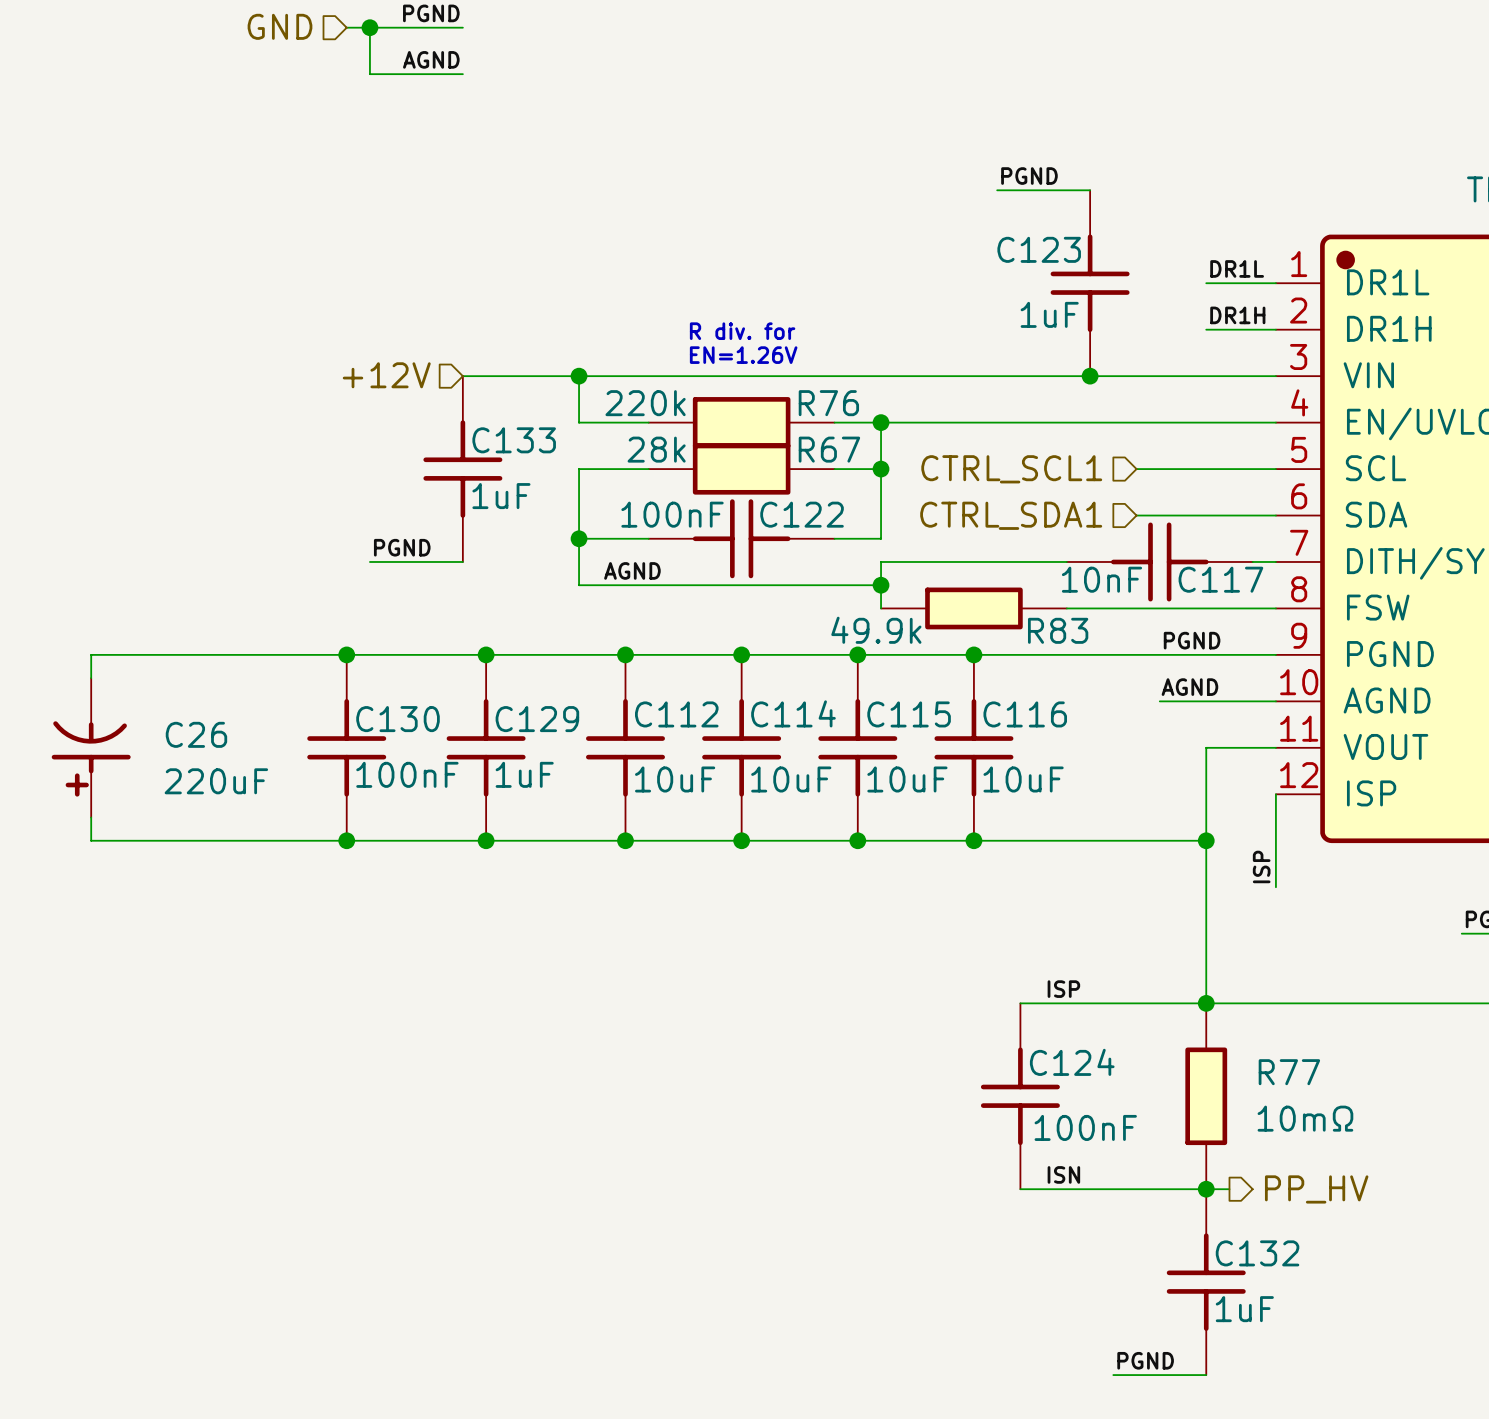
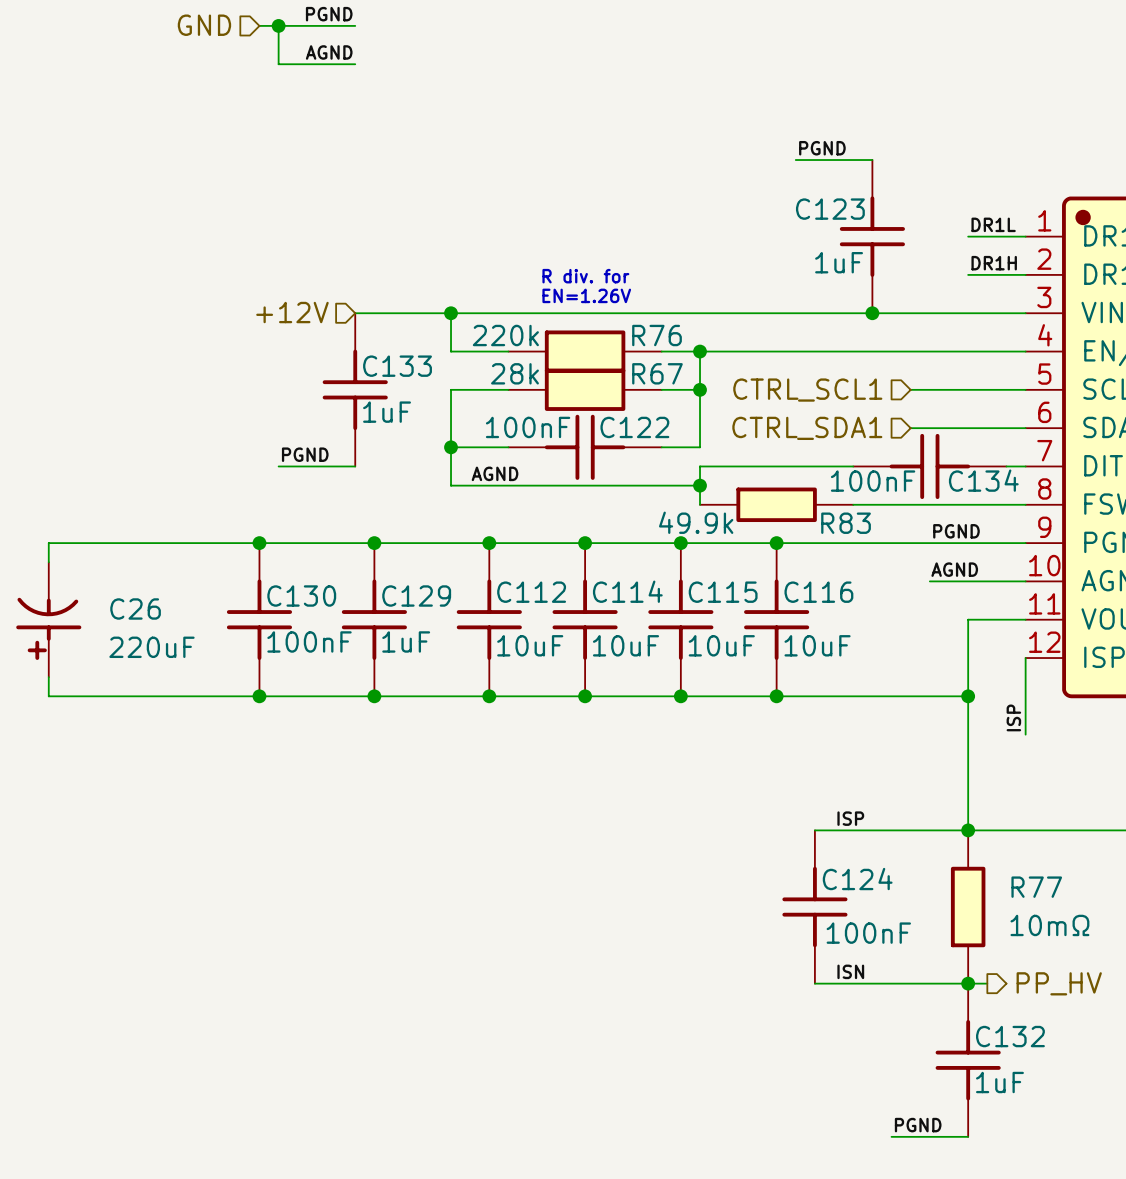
C117 value: 10nF (1101, 579) -> 100nF (873, 481)
C117 name: C117 (1220, 579) -> C134 (983, 480)

